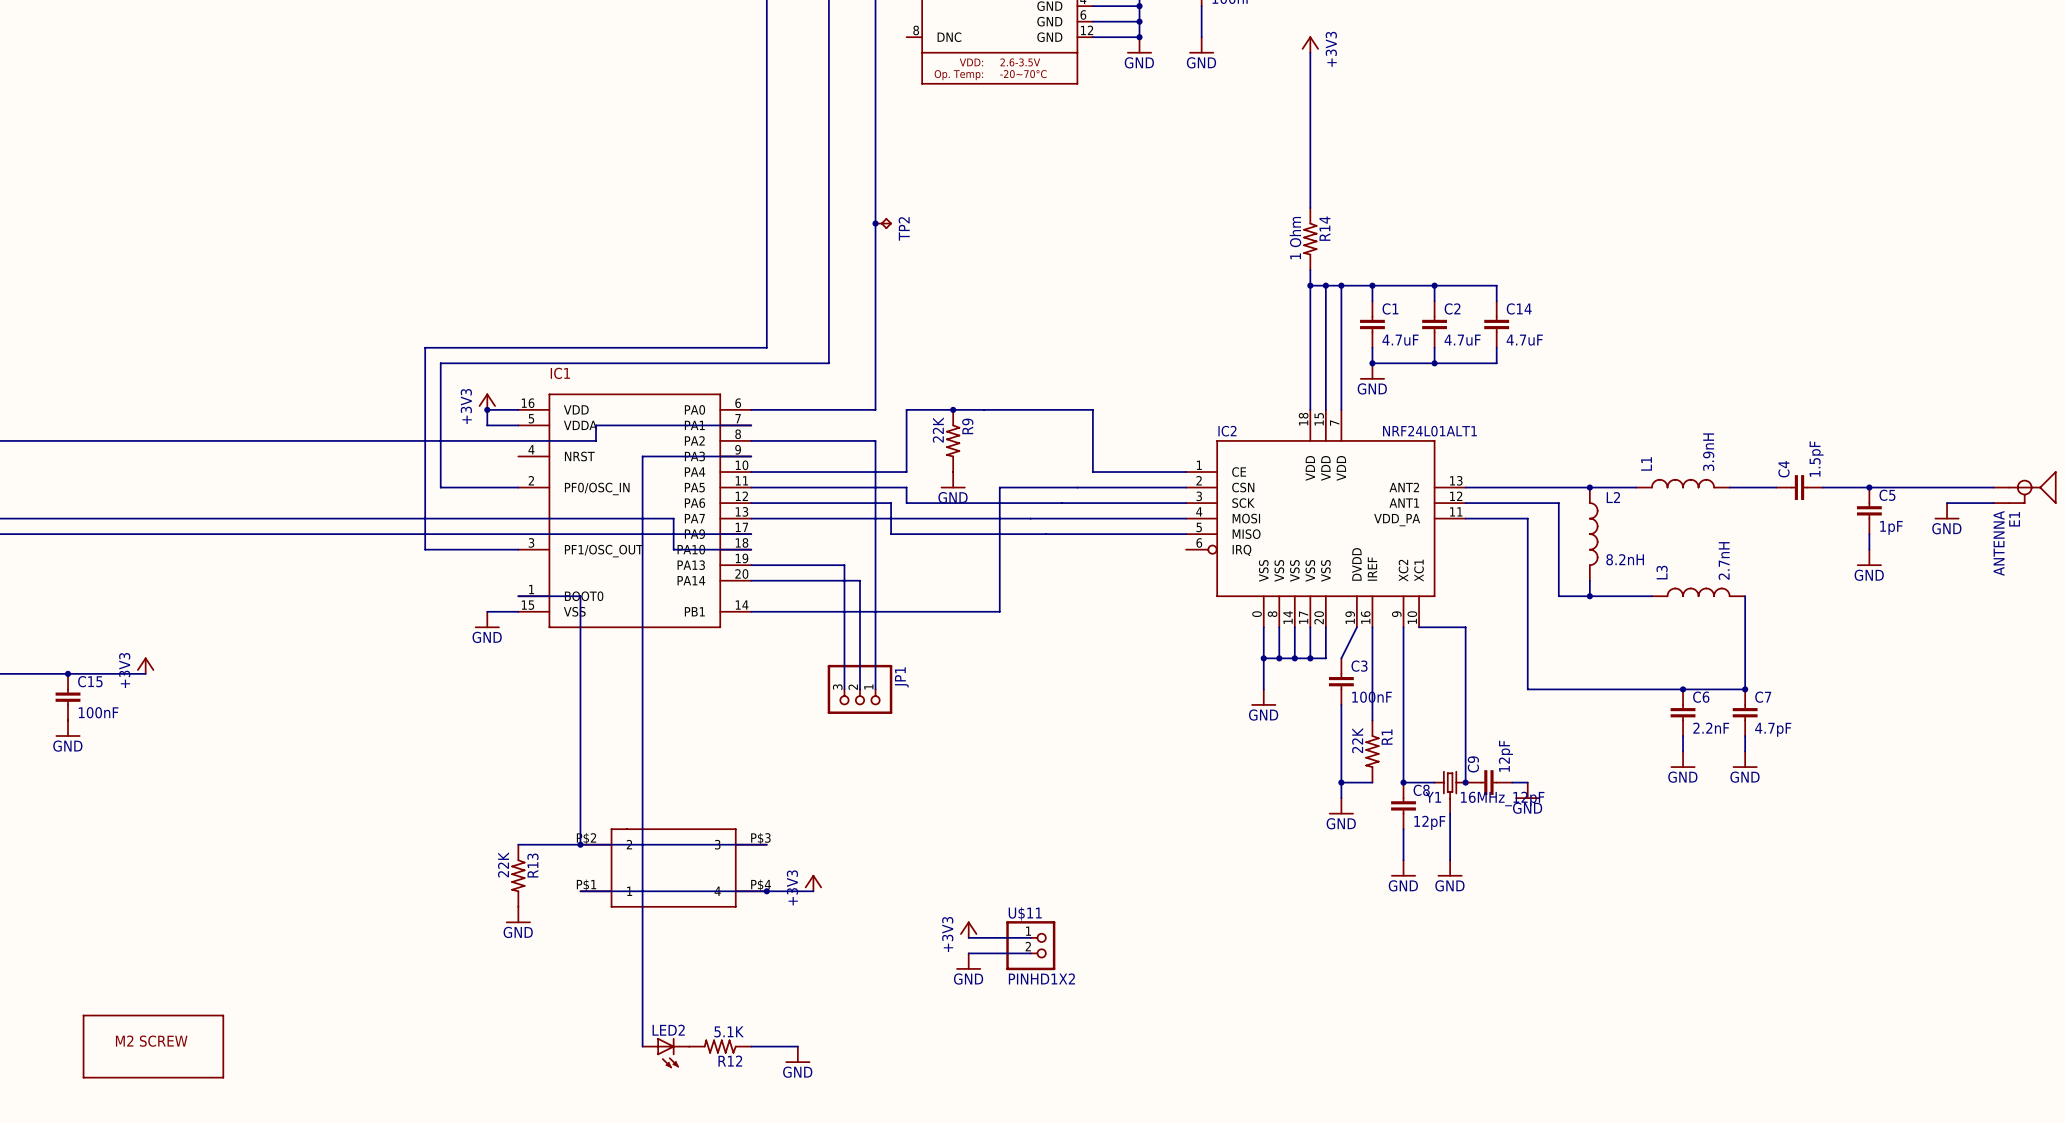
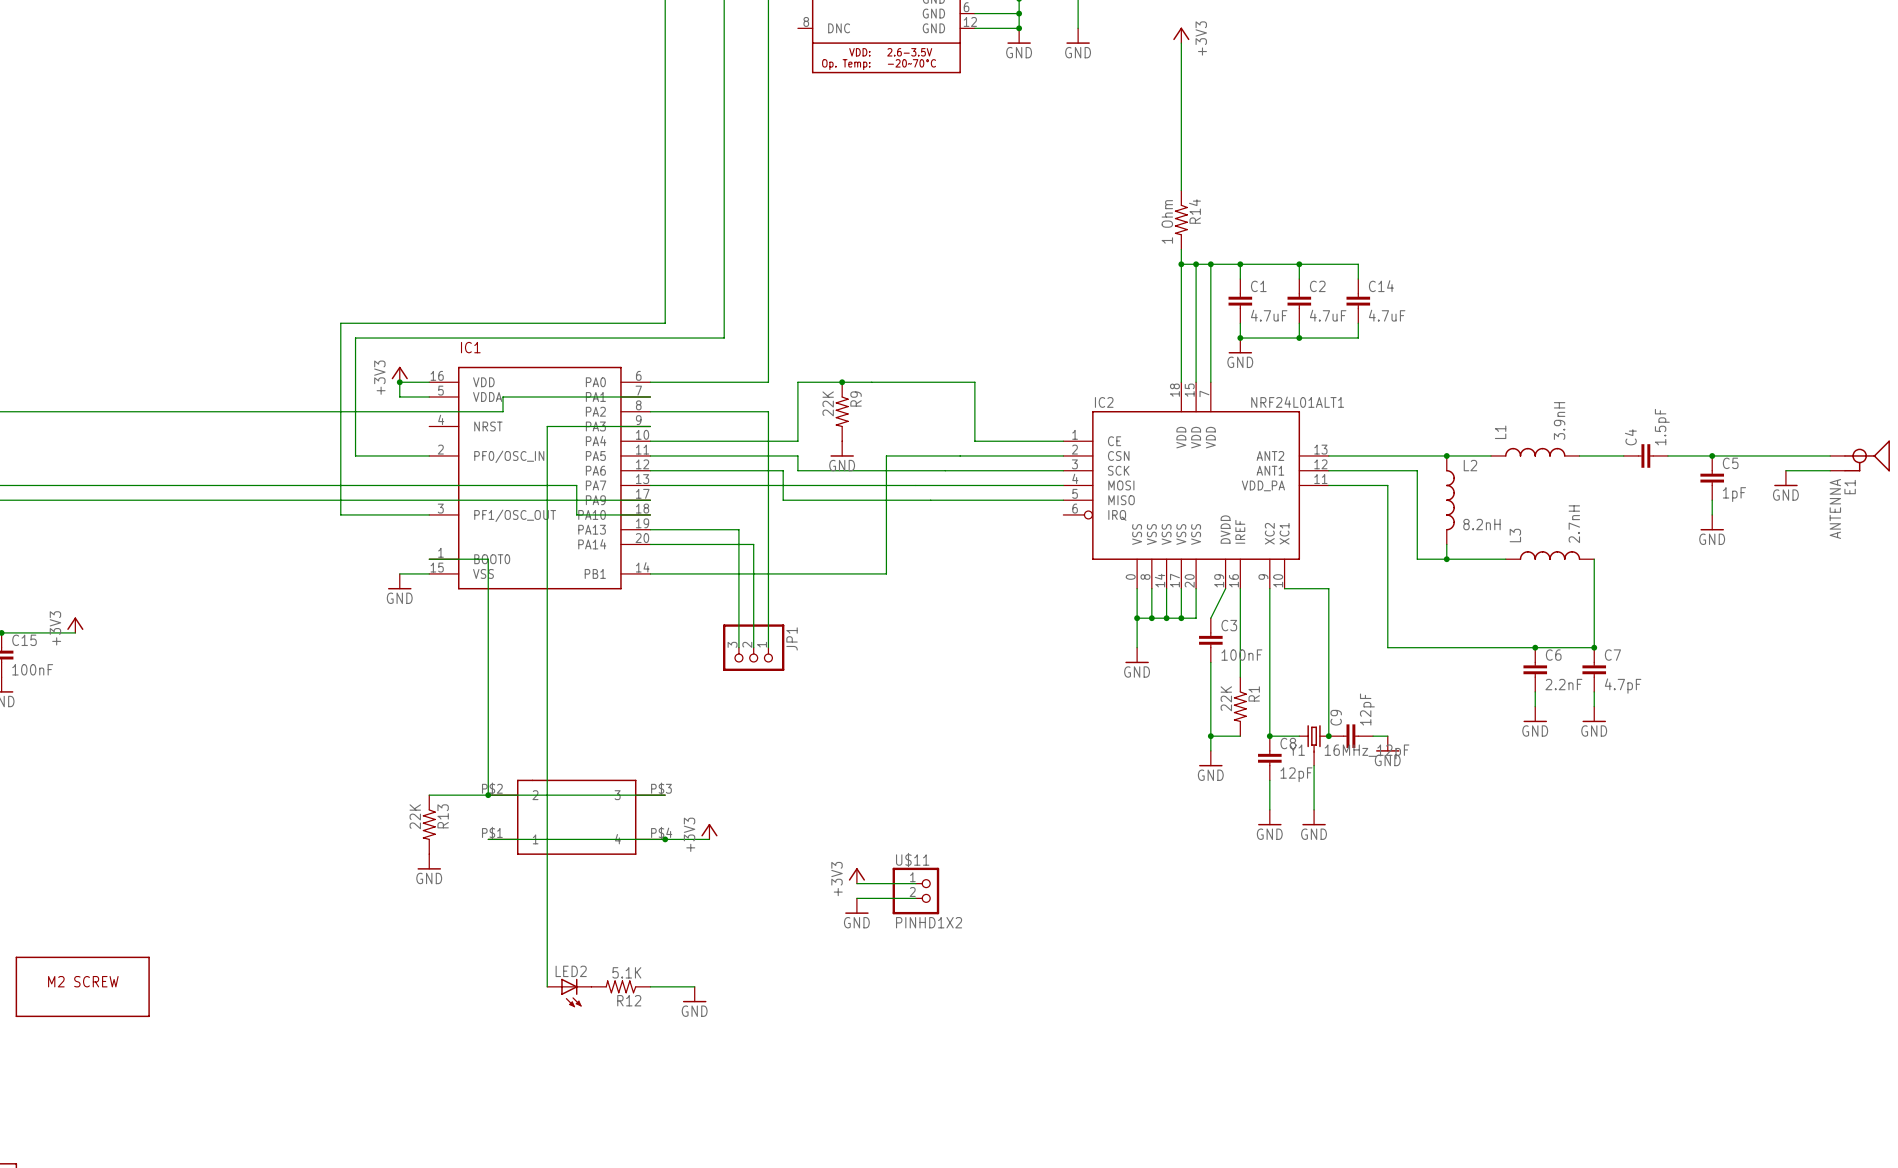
junction: (875, 223) -> none
TP2: (883, 223) -> none

